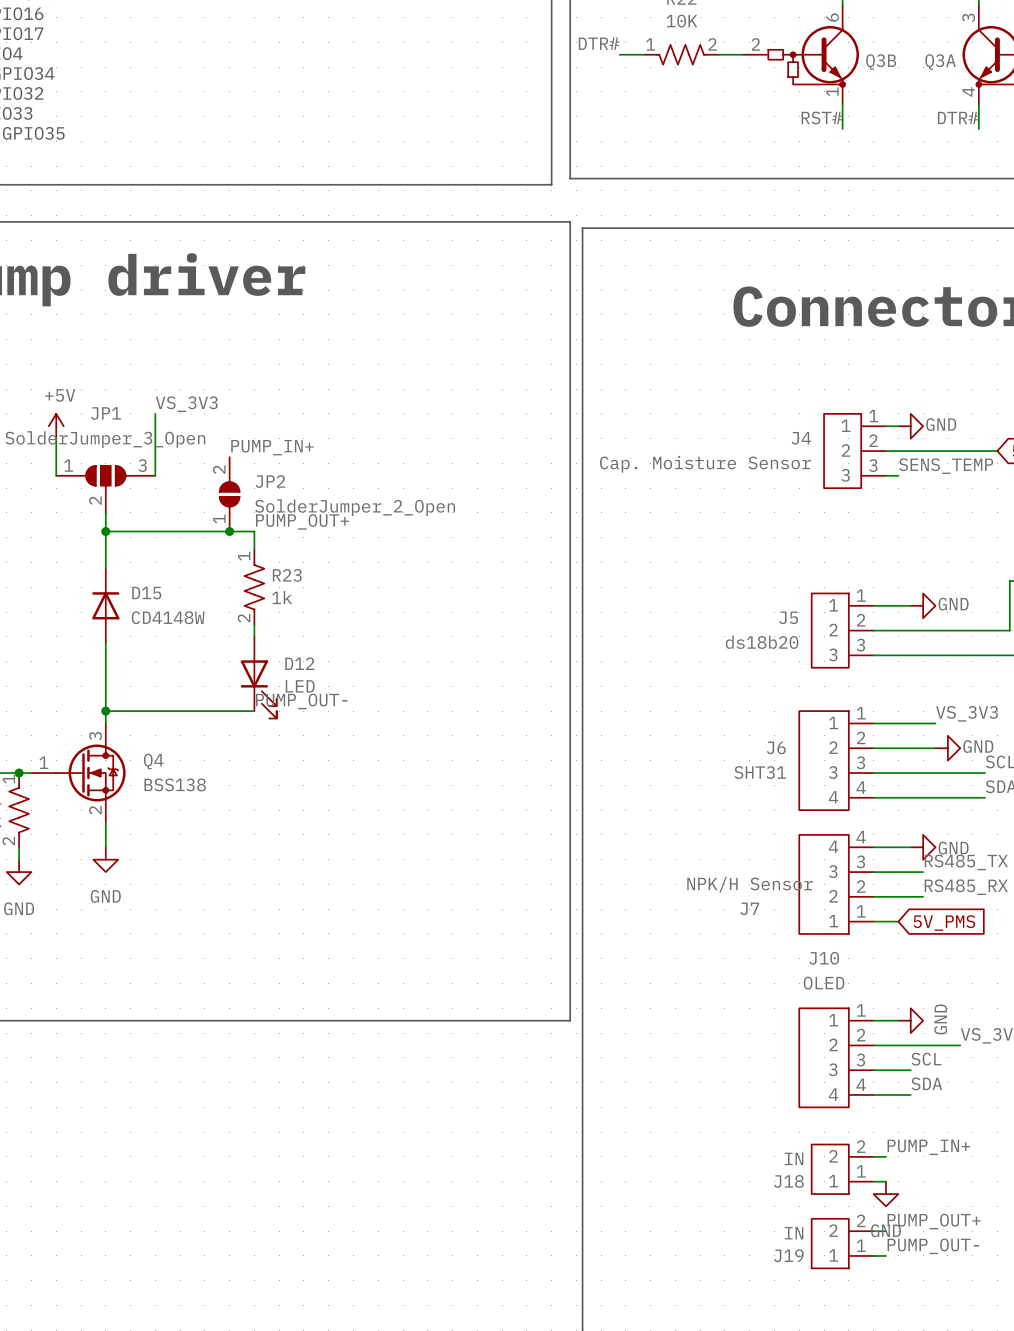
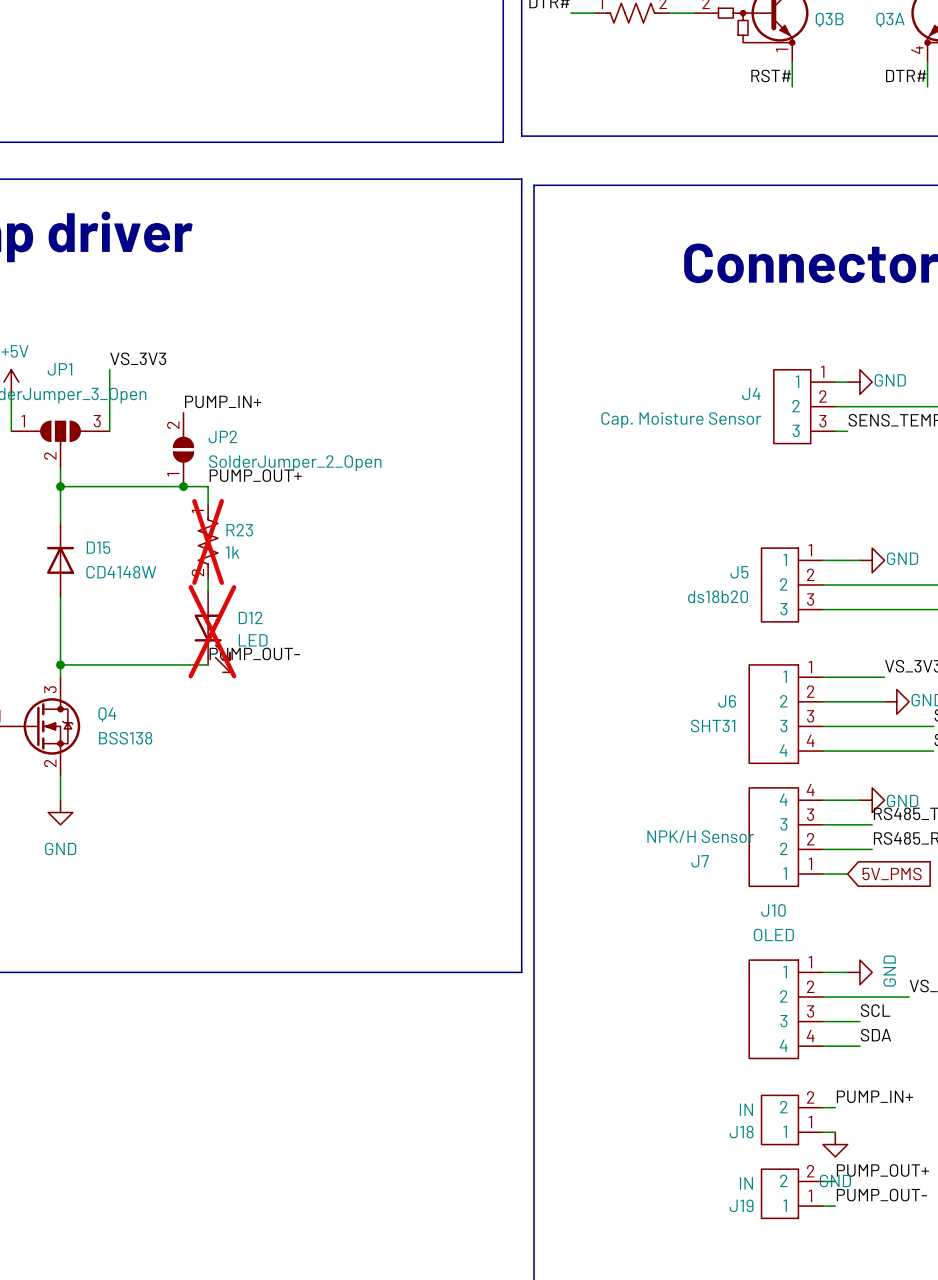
R23 do-not-place cross: none -> (208, 541)
D12 do-not-place cross: none -> (212, 631)

